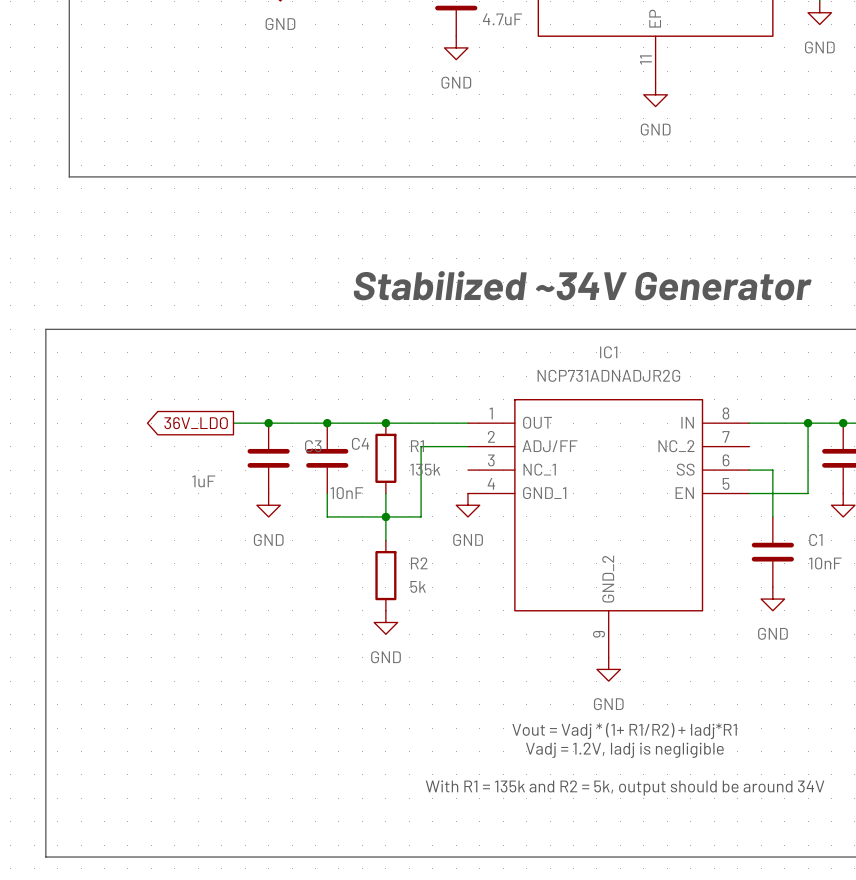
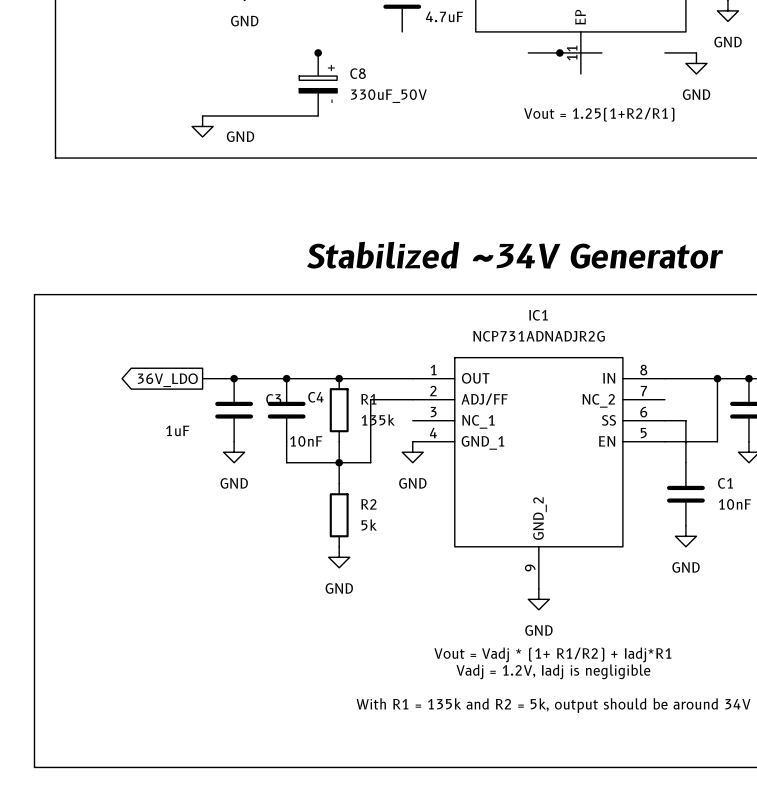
power symbol: GND (456, 47) -> none
junction: none -> (318, 52)
wire: none -> (528, 52) (601, 52)
junction: none -> (559, 52)
wire: none -> (664, 52) (696, 52)
power symbol: none -> GND (696, 63)
C8: none -> 330uF_50V (318, 84)
power symbol: GND (655, 94) -> none
text: none -> Vout = 1.25(1+R2/R1) (599, 114)
wire: none -> (202, 115) (318, 115)
power symbol: none -> GND (202, 126)

